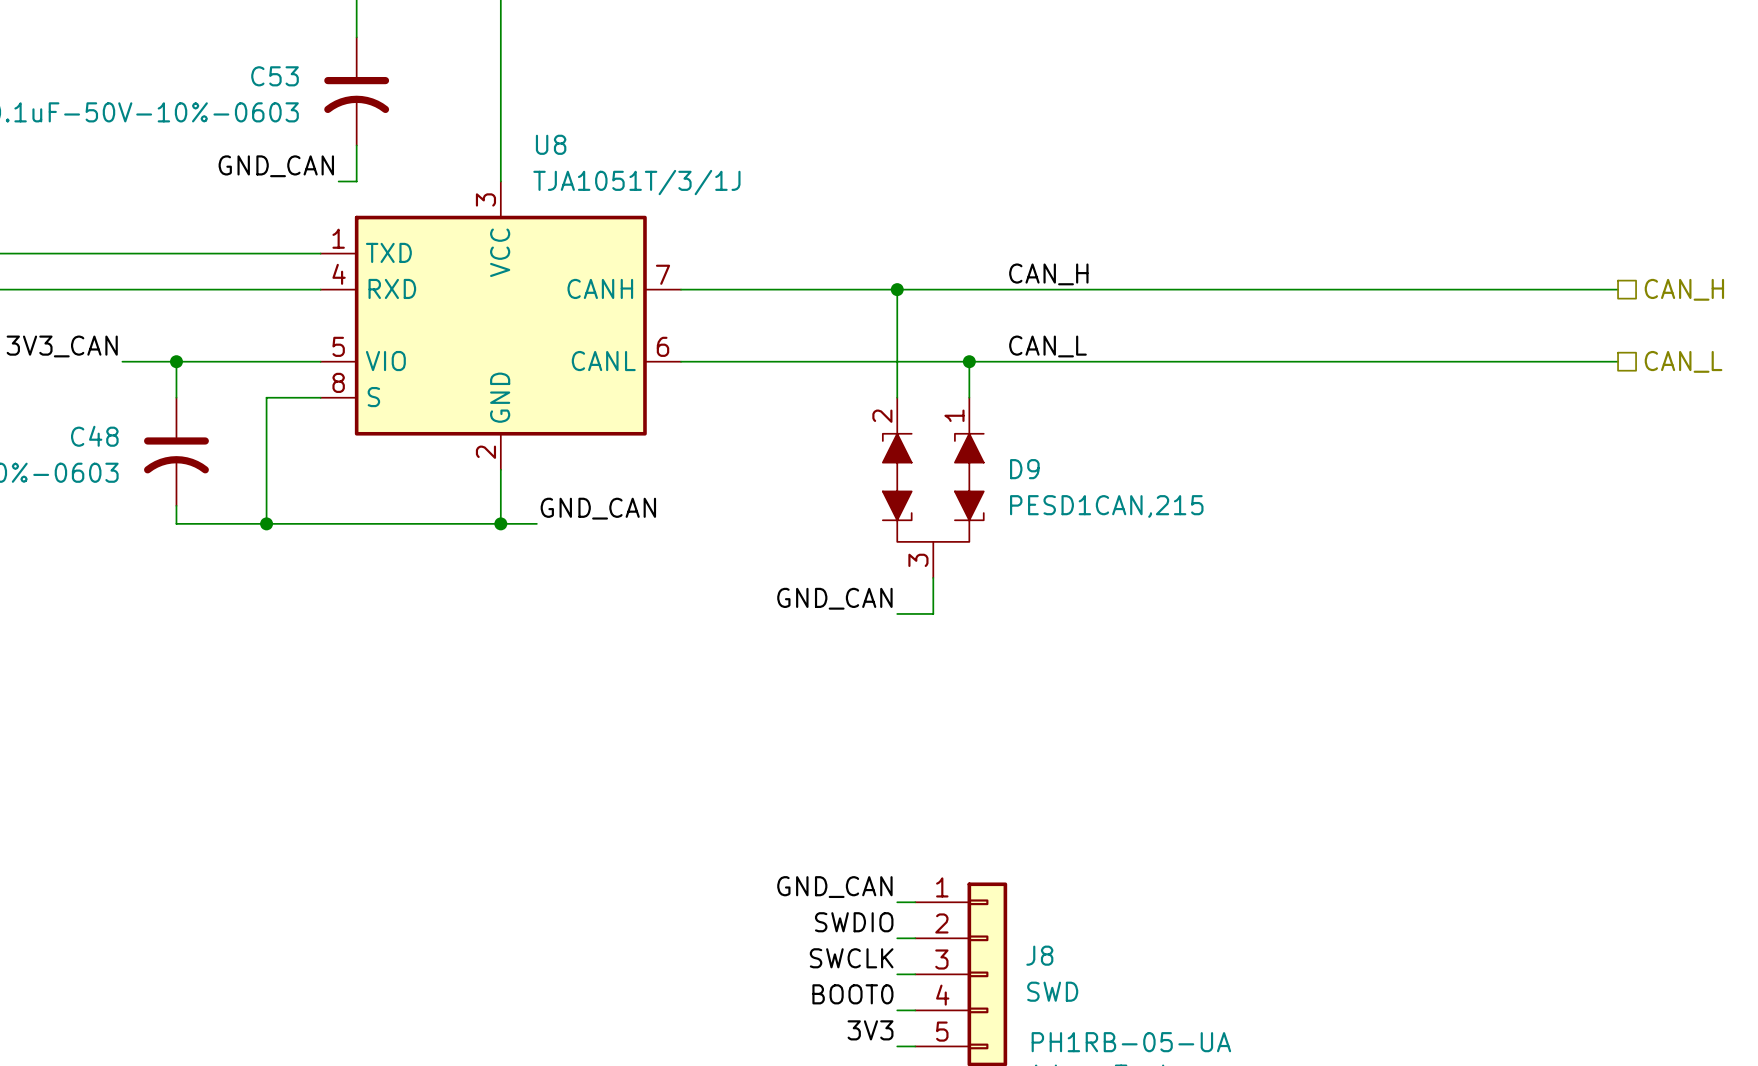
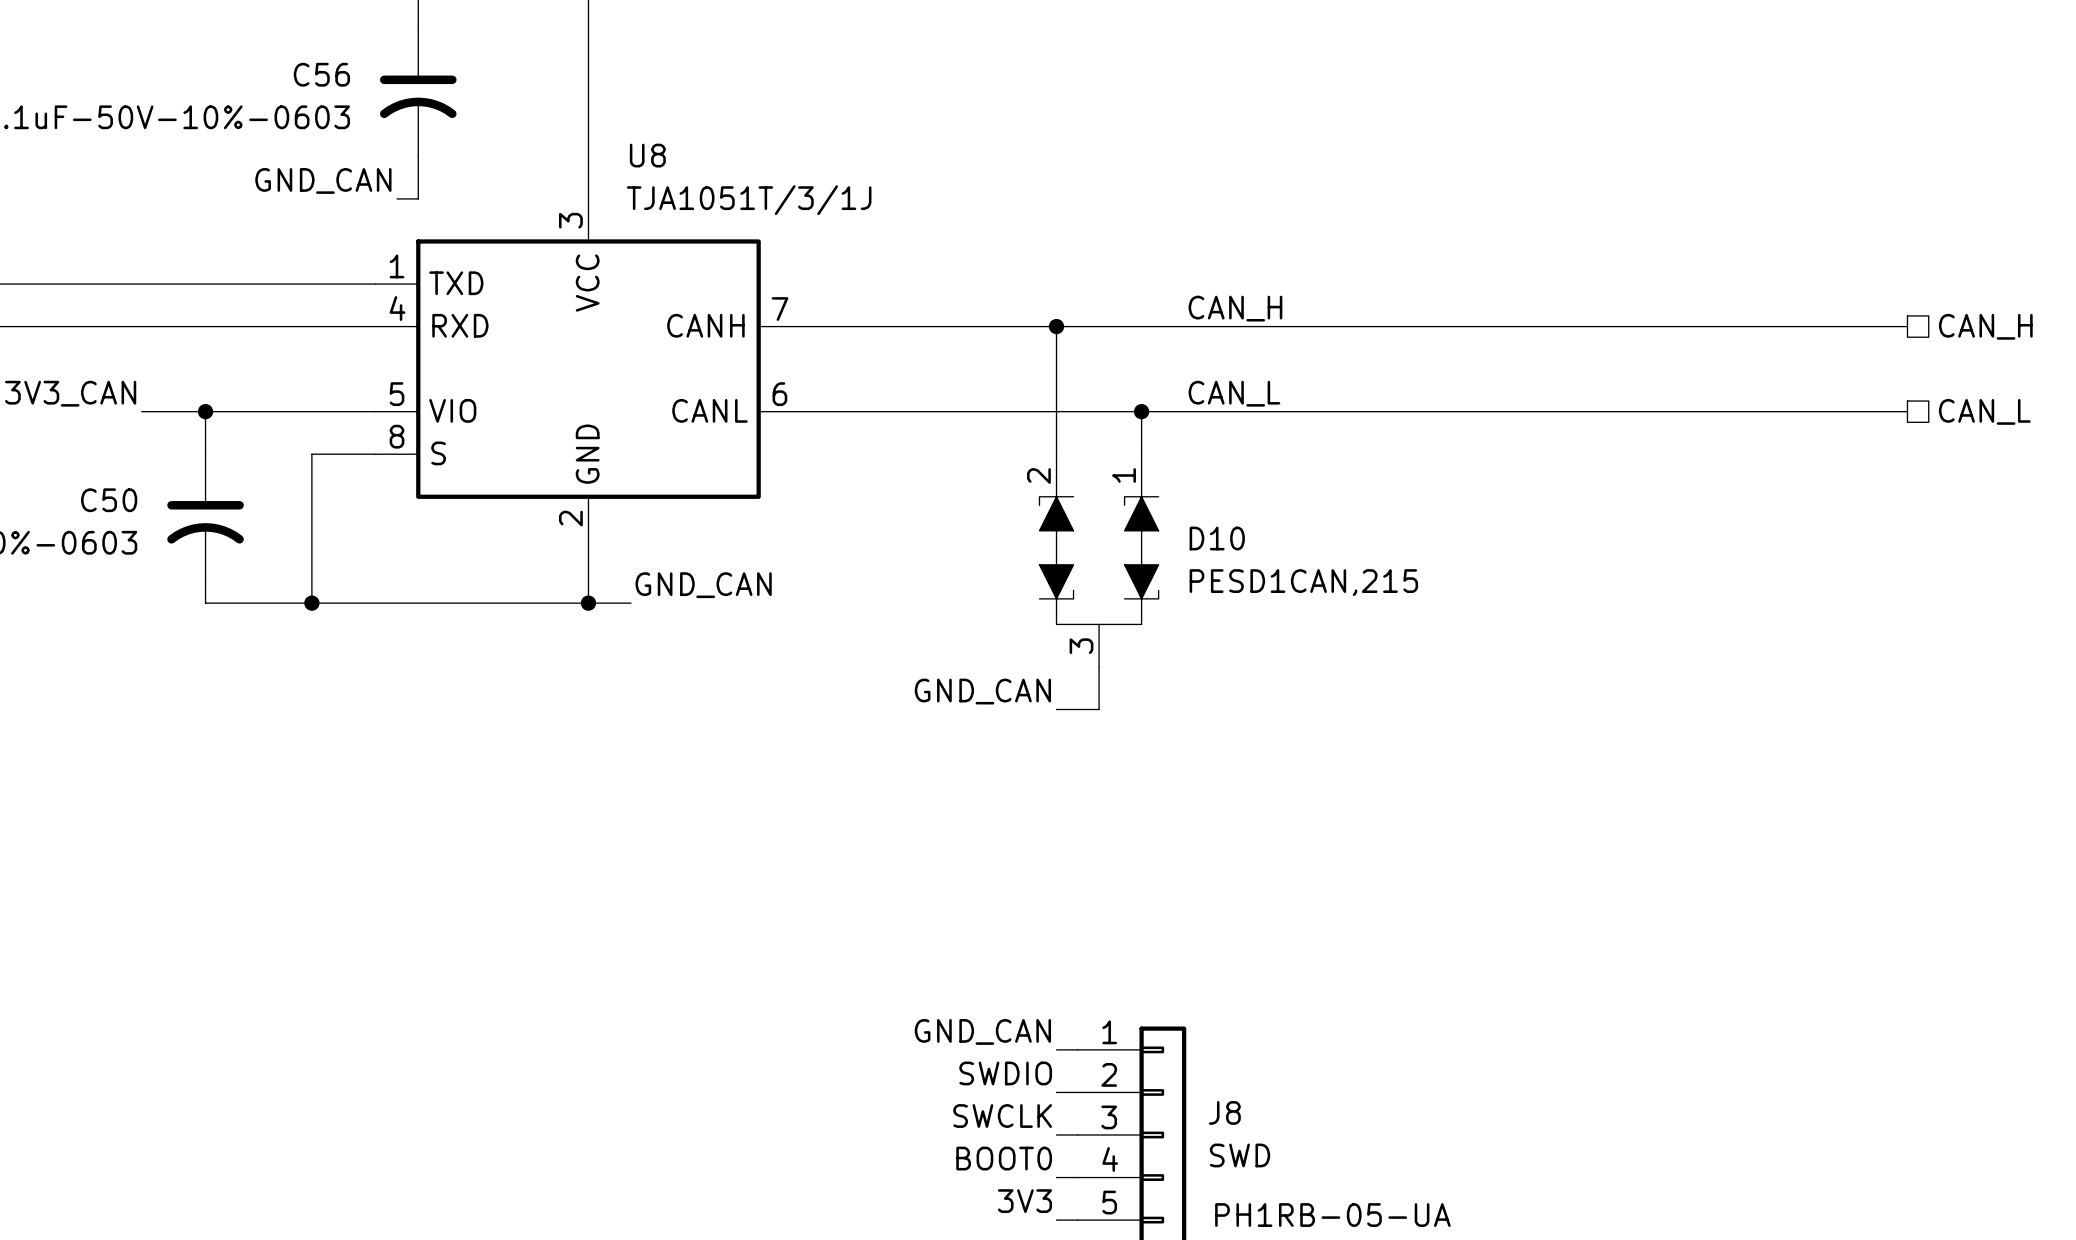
C53 name: C53 (275, 76) -> C56 (321, 74)
C48 name: C48 (94, 436) -> C50 (109, 500)
D9 name: D9 (1024, 469) -> D10 (1217, 538)

